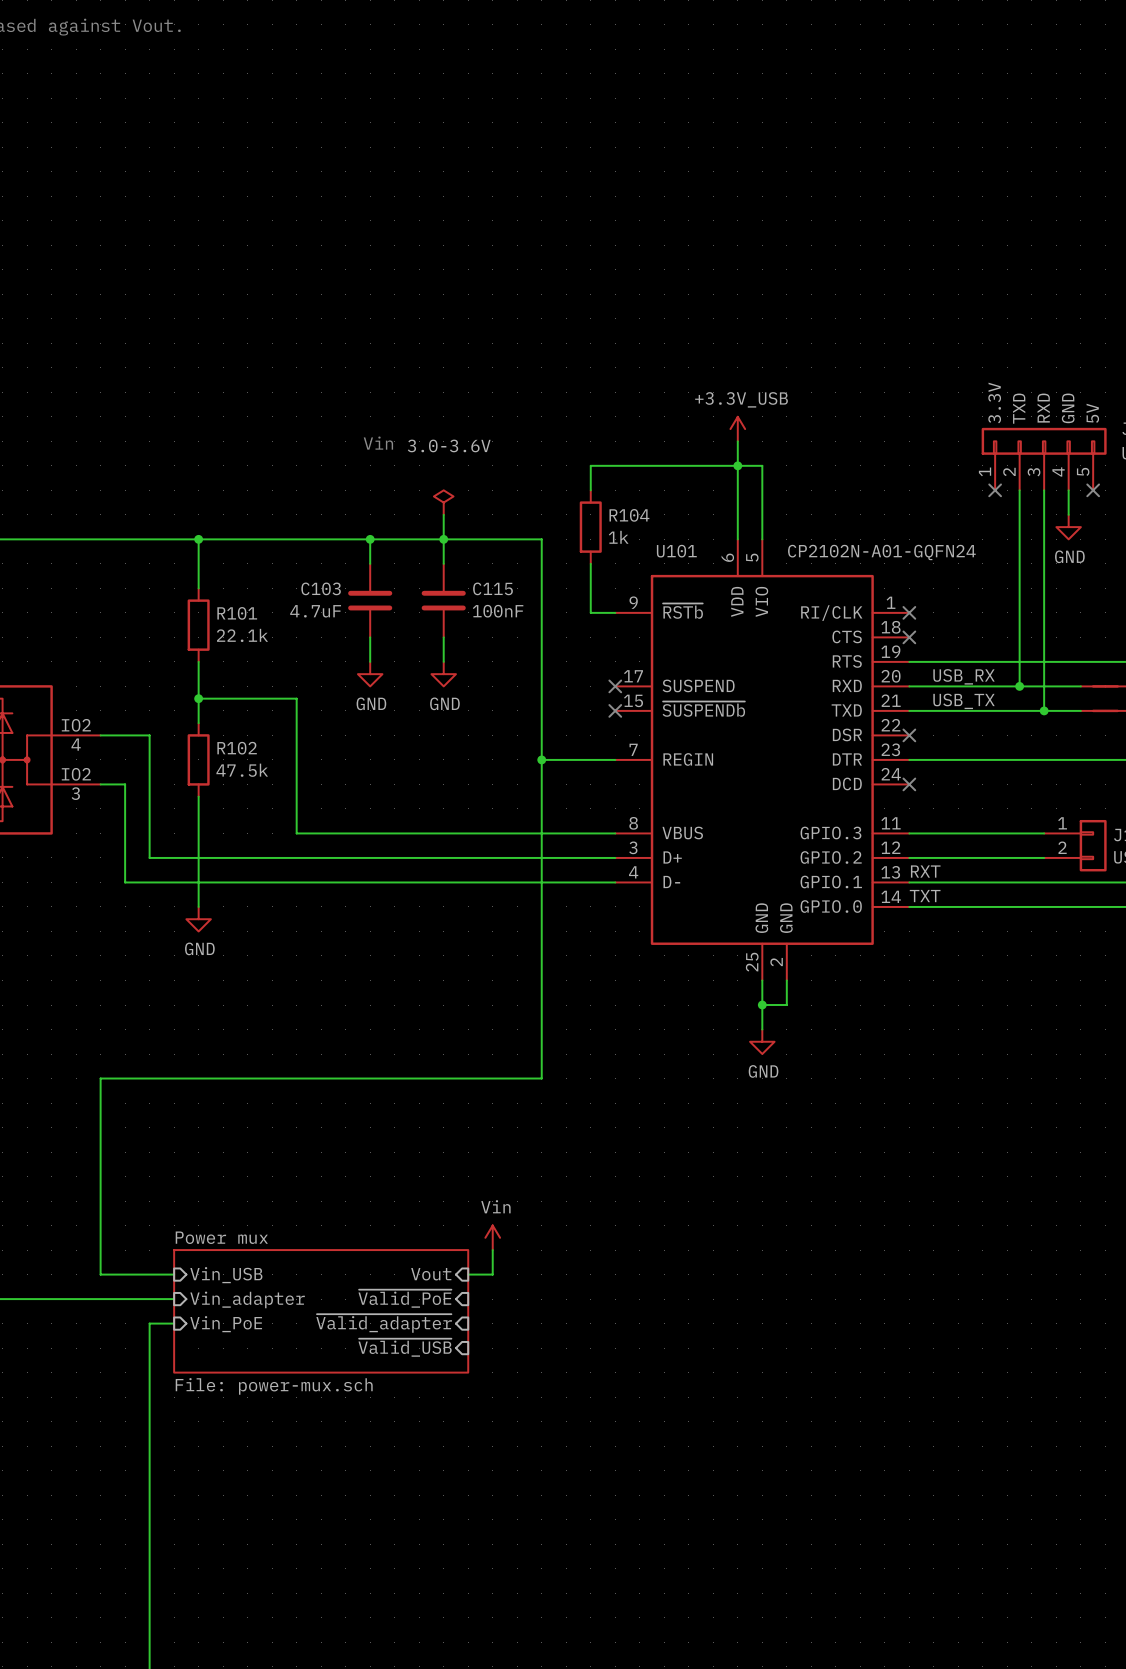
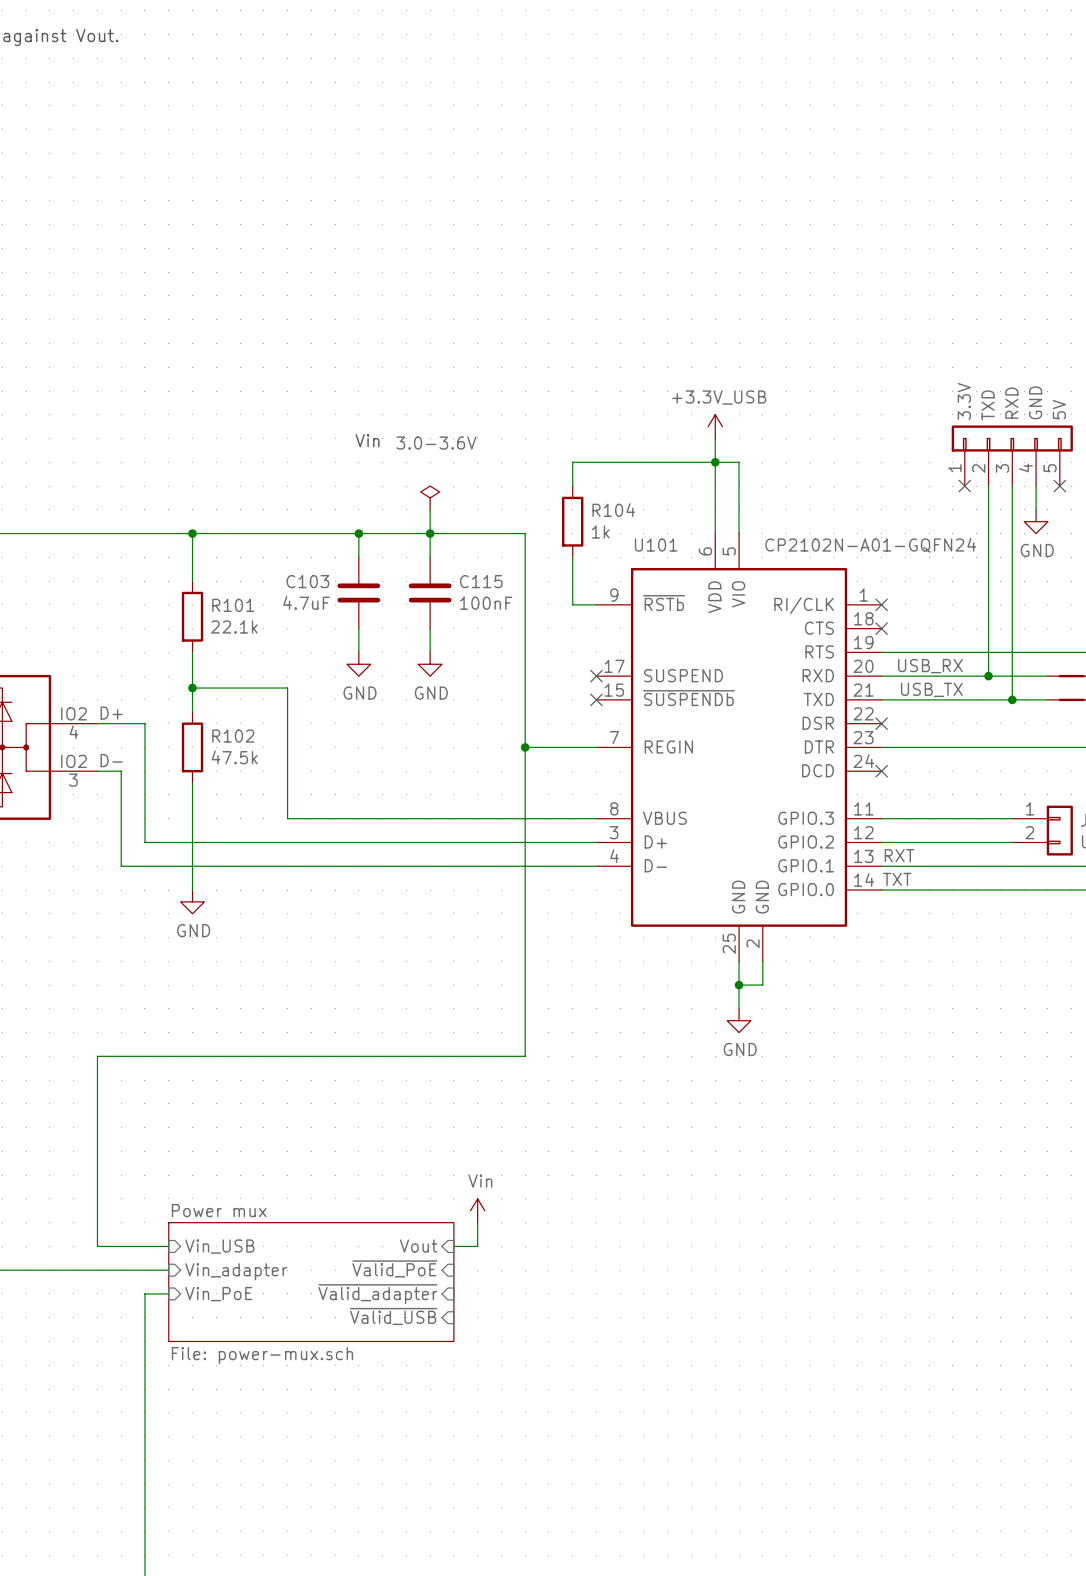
label: none -> D+ (111, 713)
label: none -> D- (111, 760)

